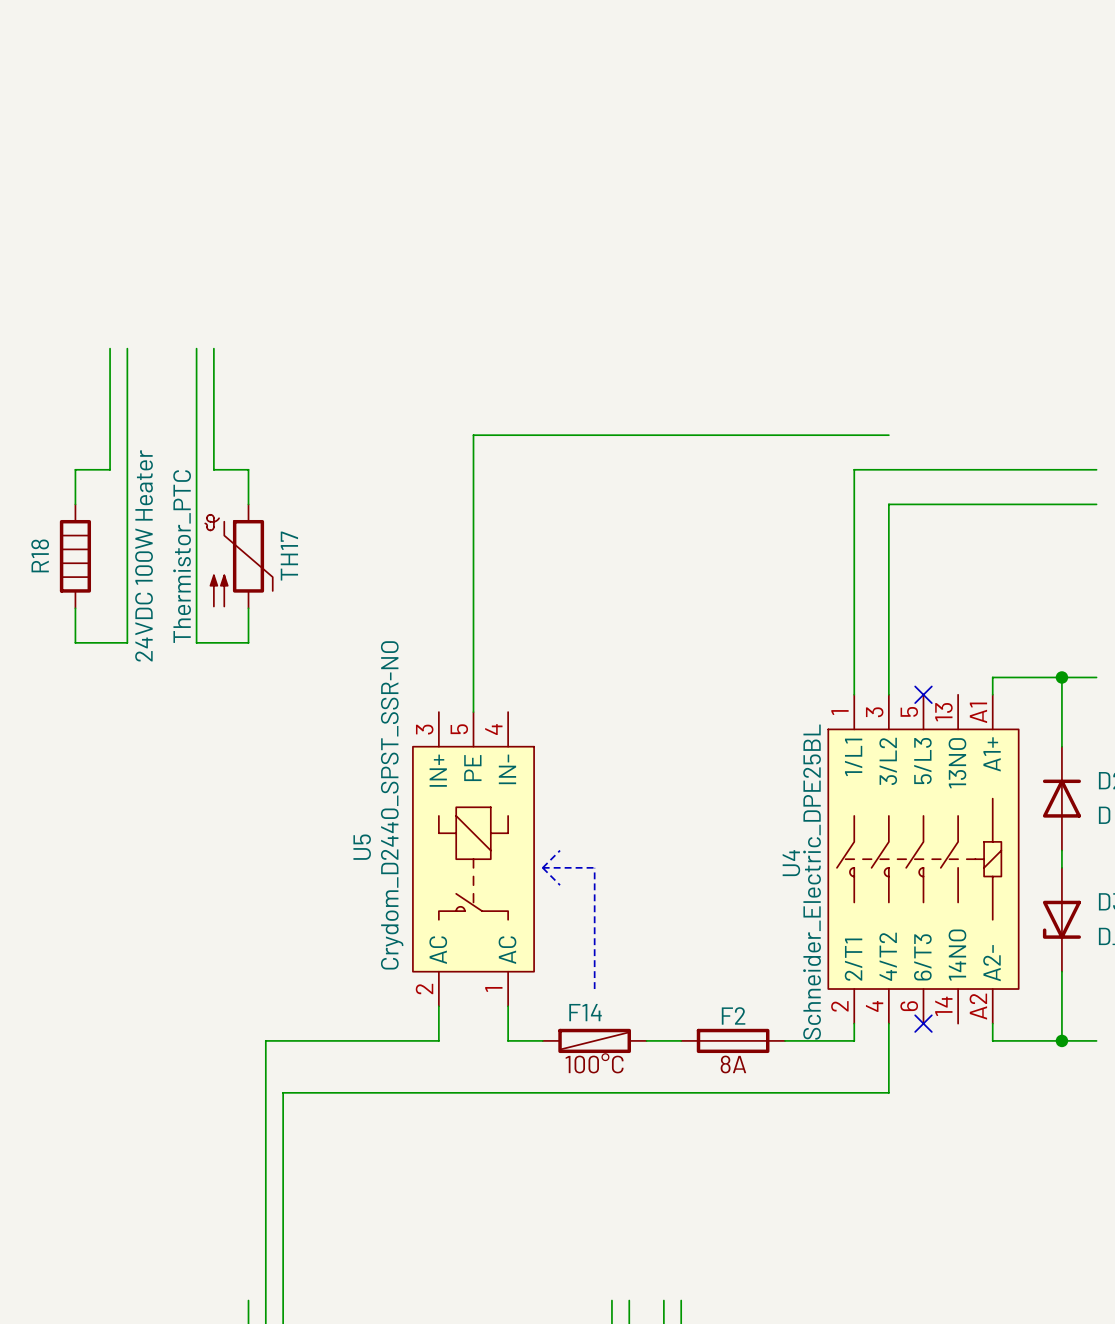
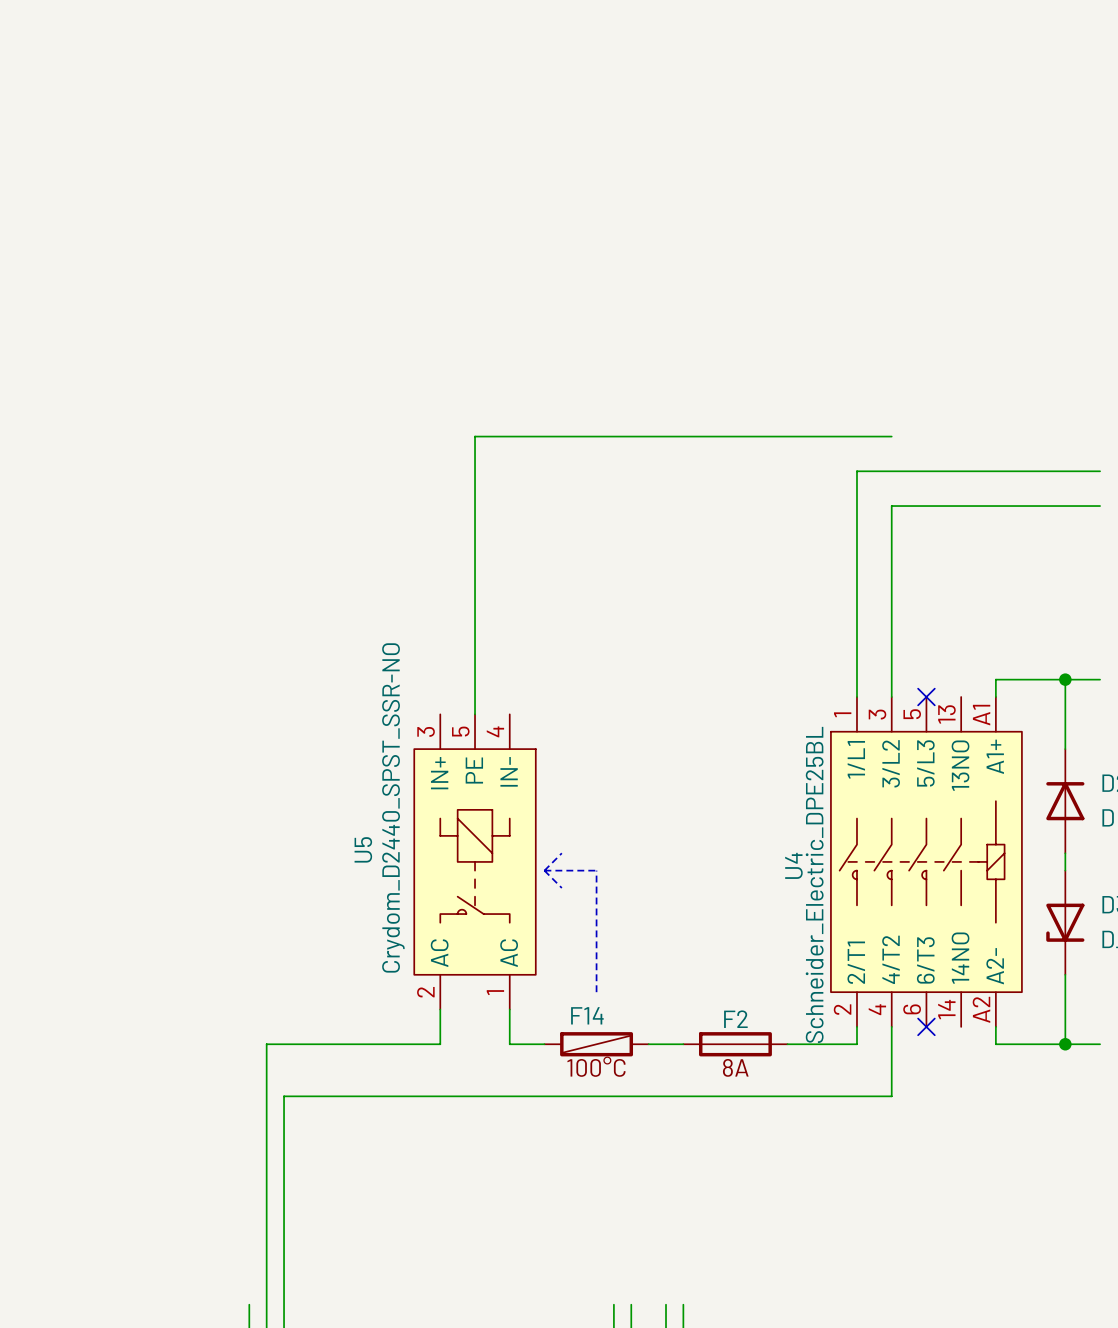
wire: (110, 348) (110, 469) (75, 469) (75, 504) -> none
wire: (127, 348) (127, 642) (75, 642) (75, 608) -> none
wire: (196, 348) (196, 642) (248, 642) (248, 608) -> none
wire: (213, 348) (213, 469) (248, 469) (248, 504) -> none
R18: 24VDC 100W Heater (75, 556) -> none
TH17: Thermistor_PTC (238, 556) -> none

